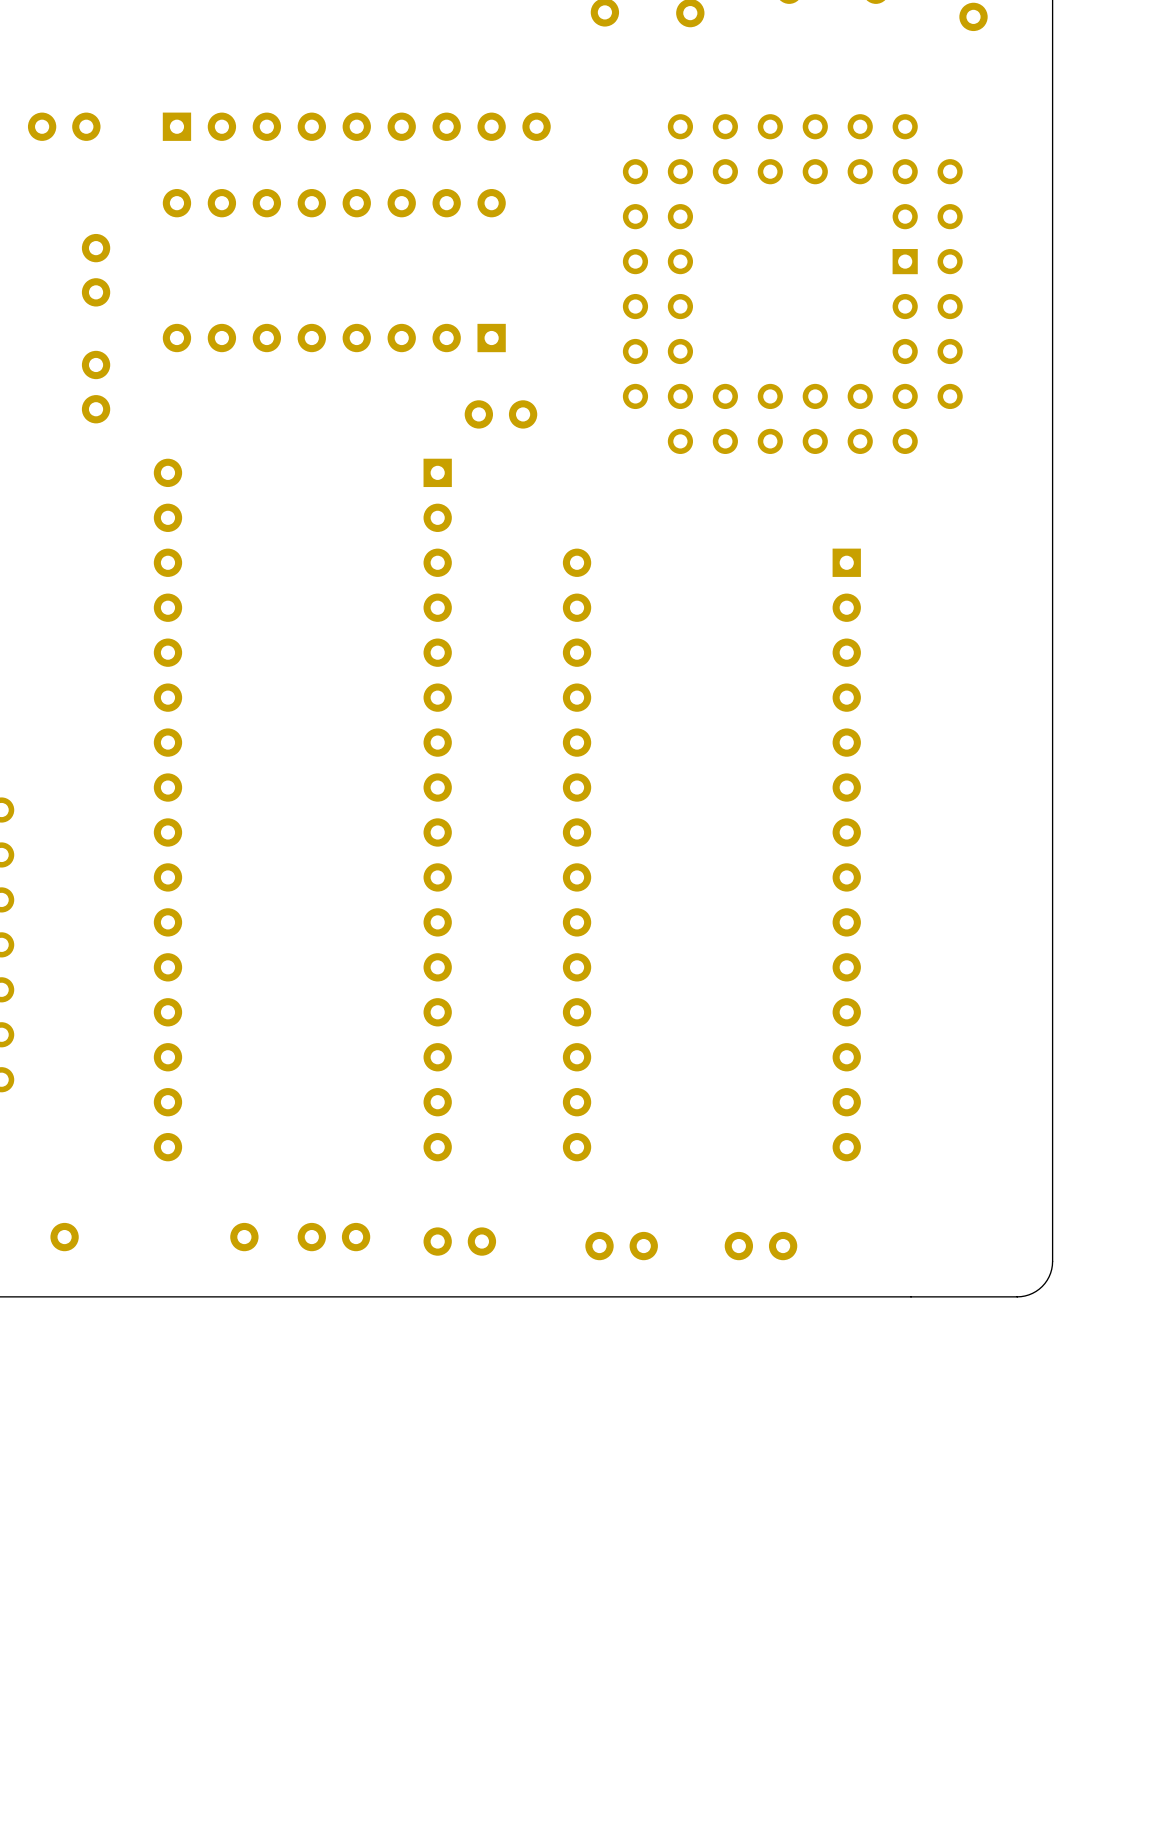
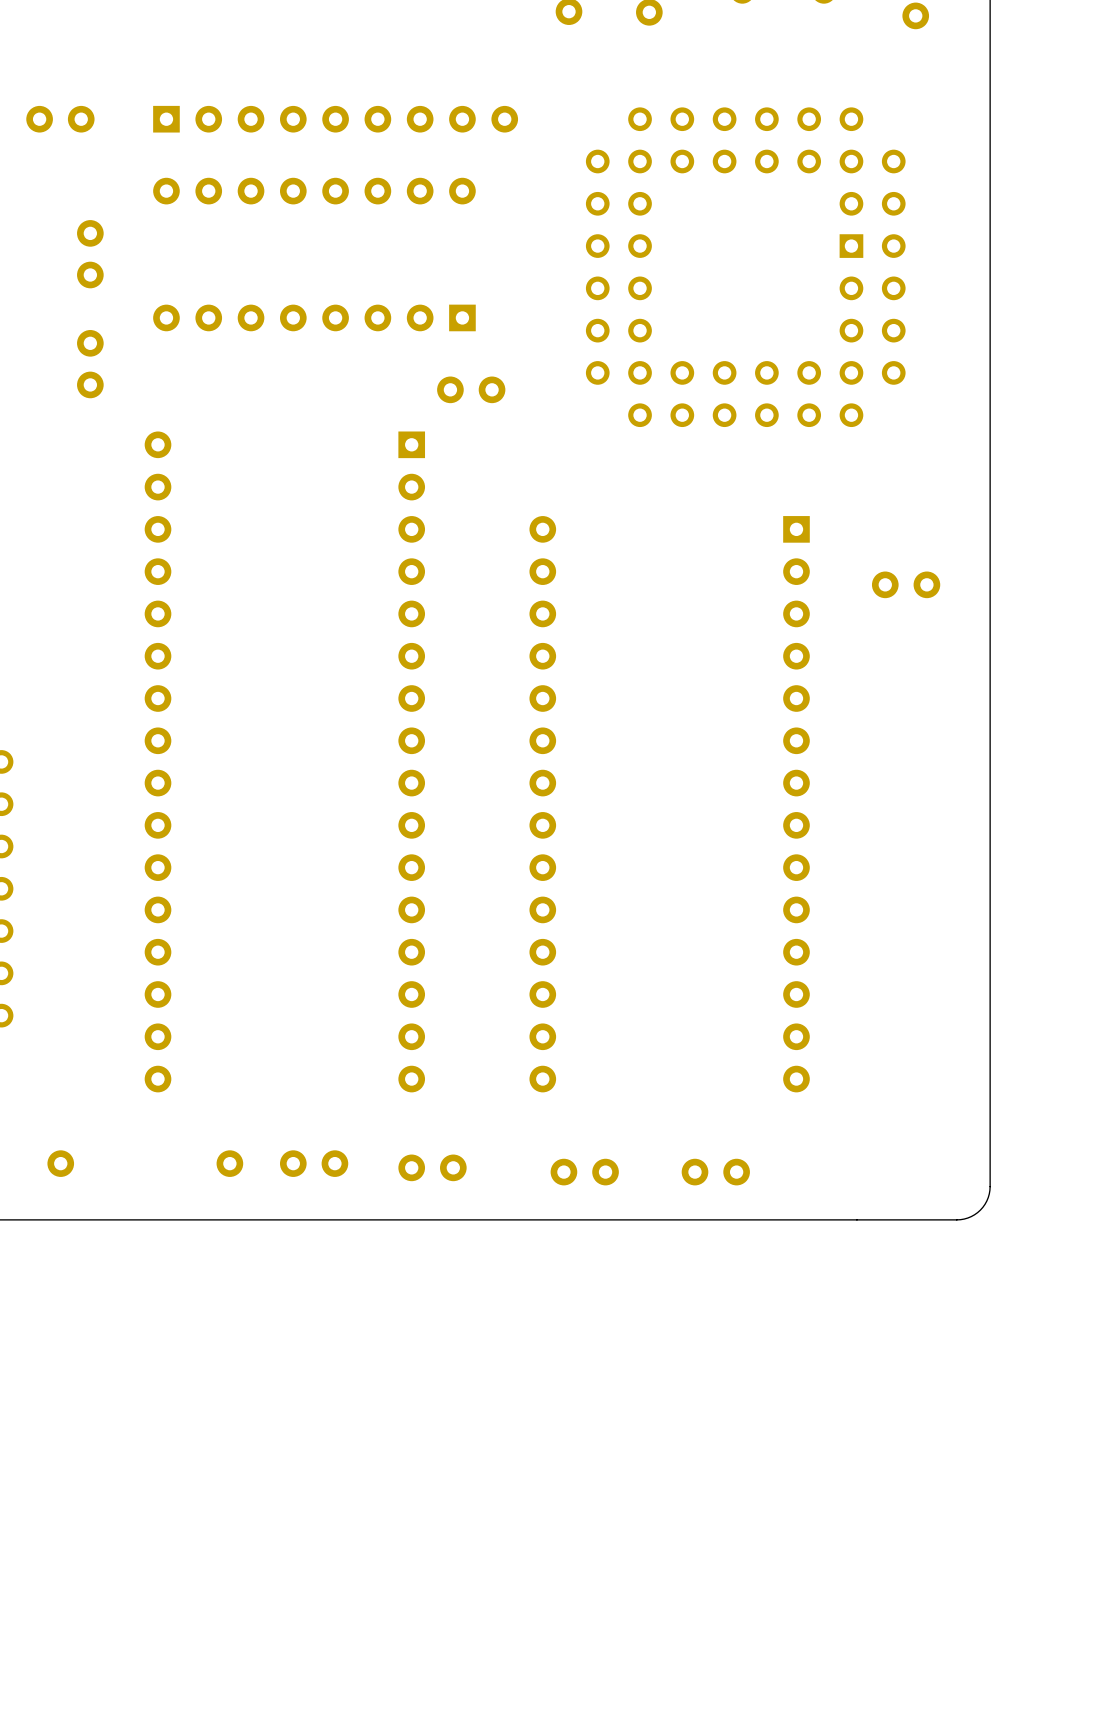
part: none -> (906, 584)

